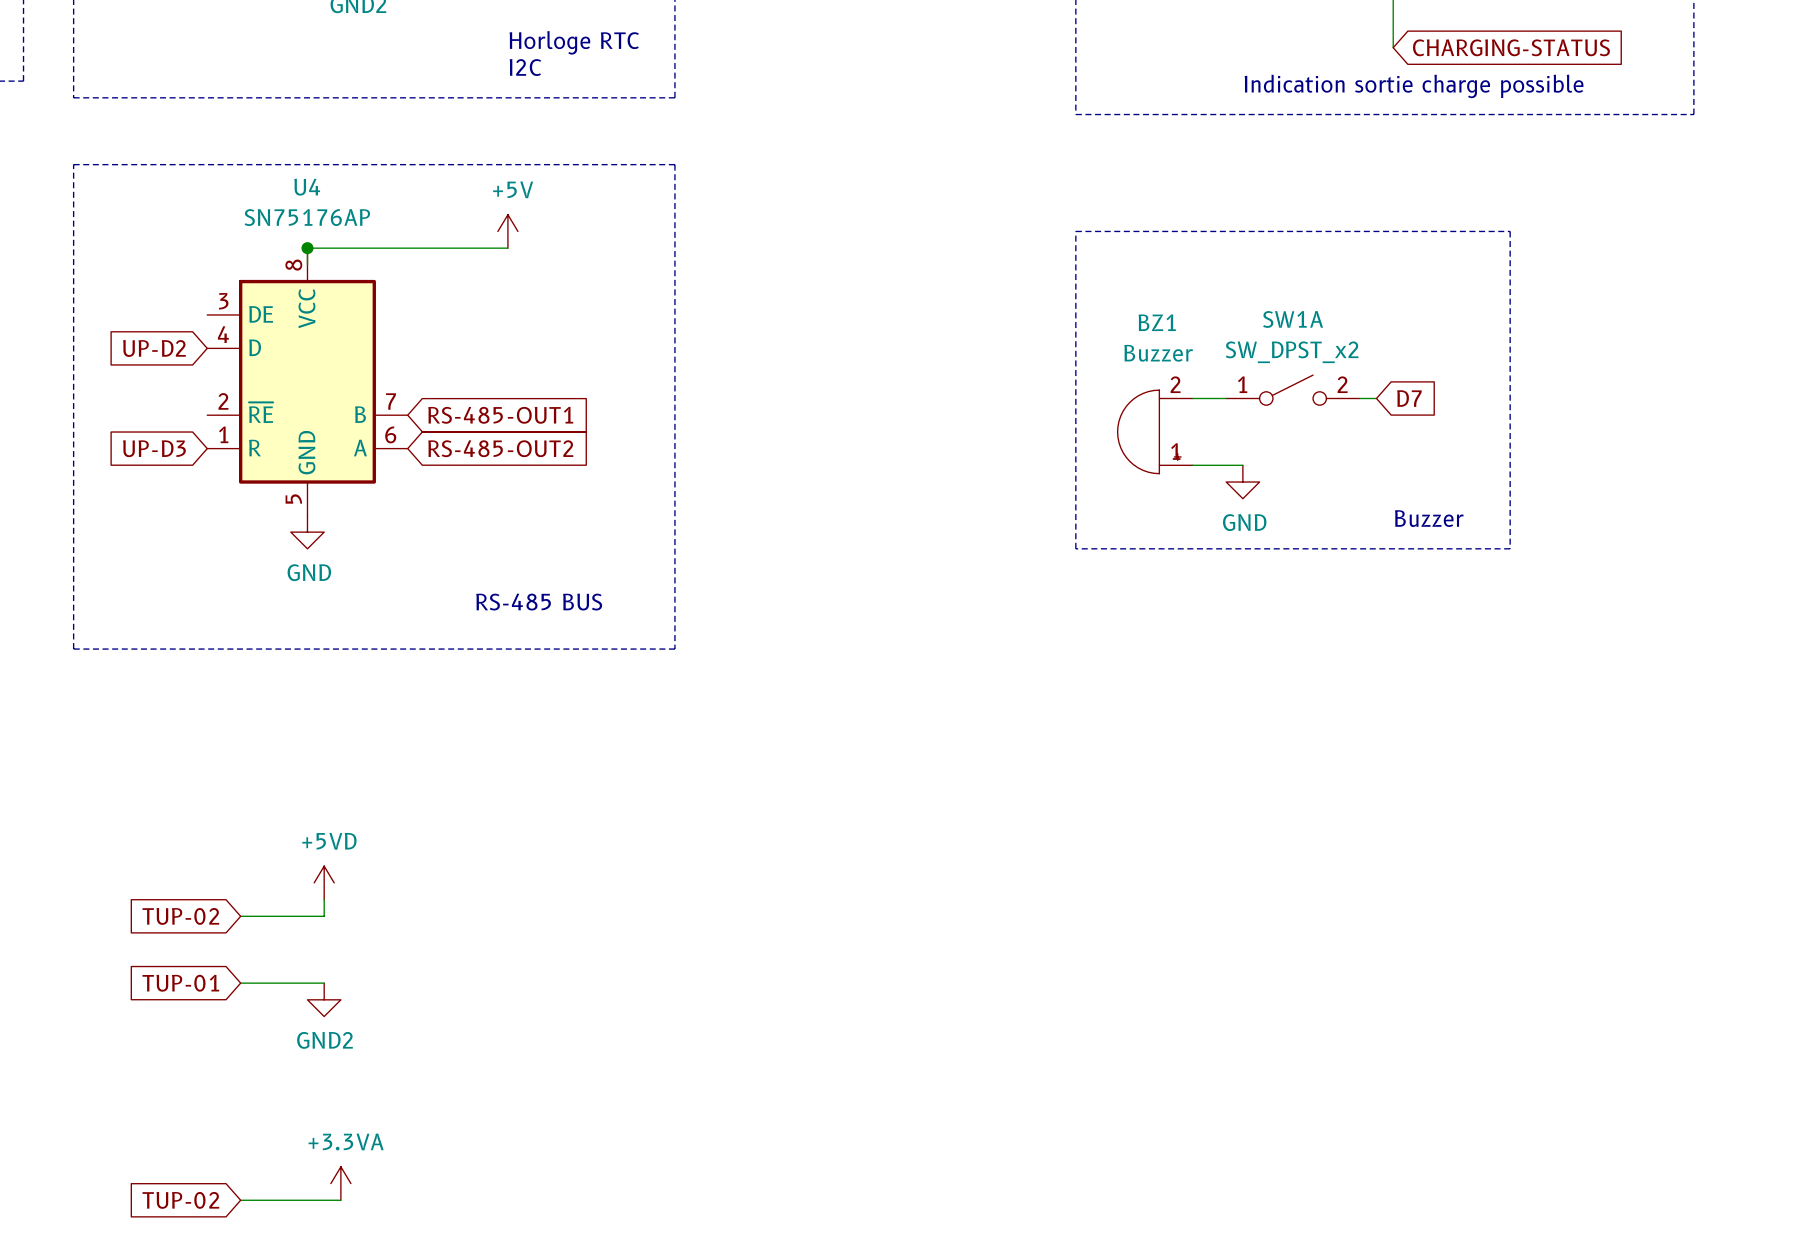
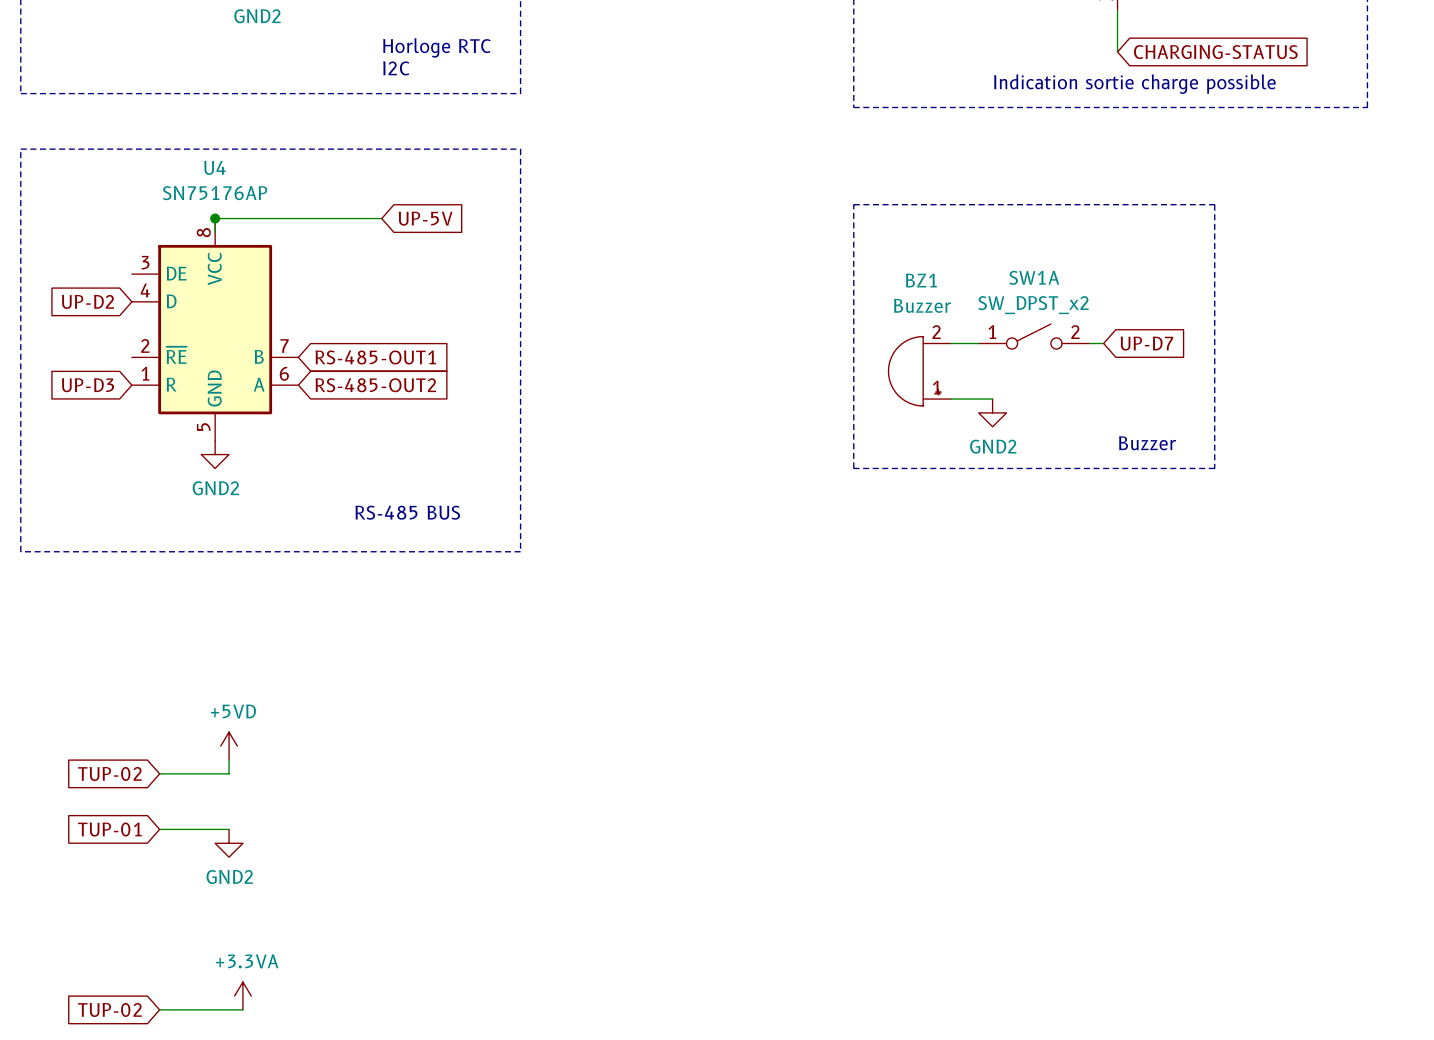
power symbol: +5V (507, 231) -> none
global label: none -> UP-5V (425, 218)
global label: D7 (1409, 398) -> UP-D7 (1146, 343)
power symbol: GND (1242, 482) -> GND2 (992, 412)
power symbol: GND (307, 532) -> GND2 (215, 454)

